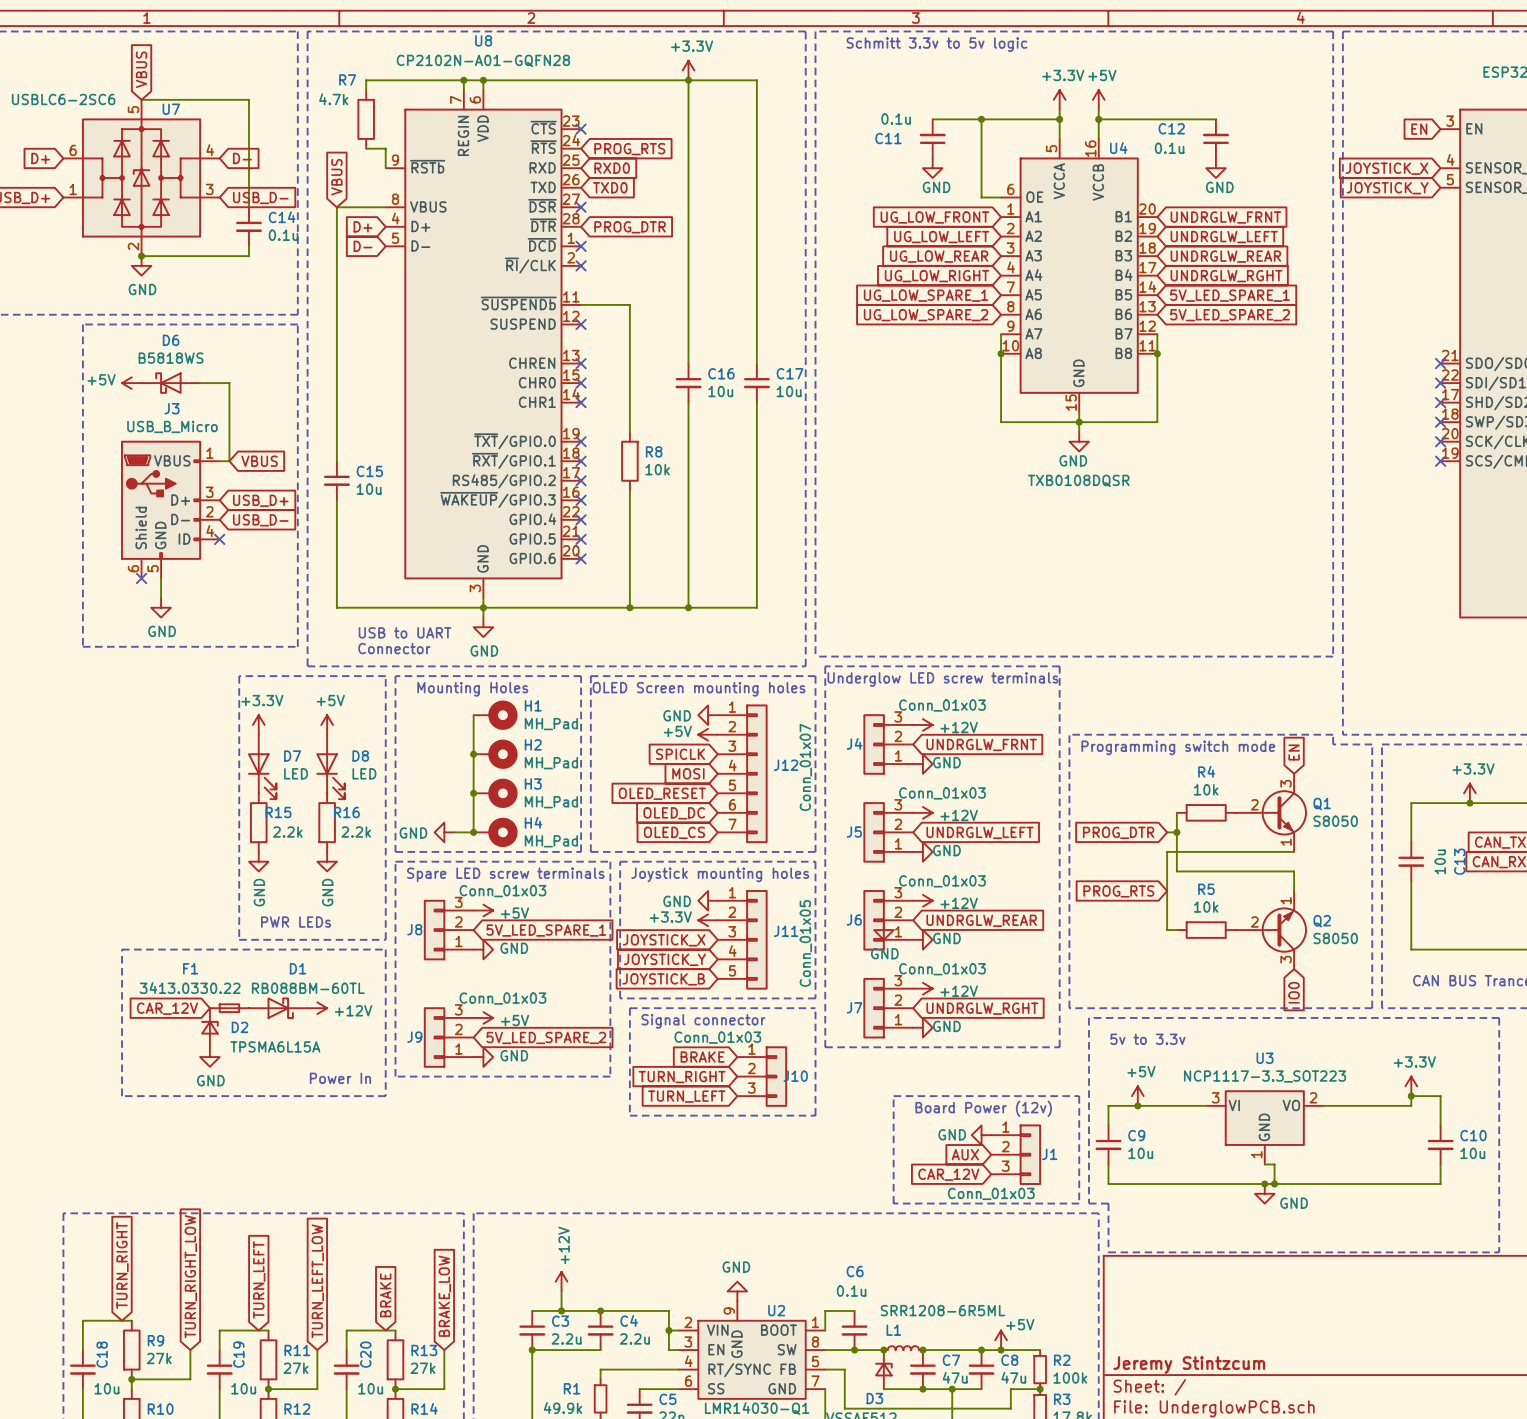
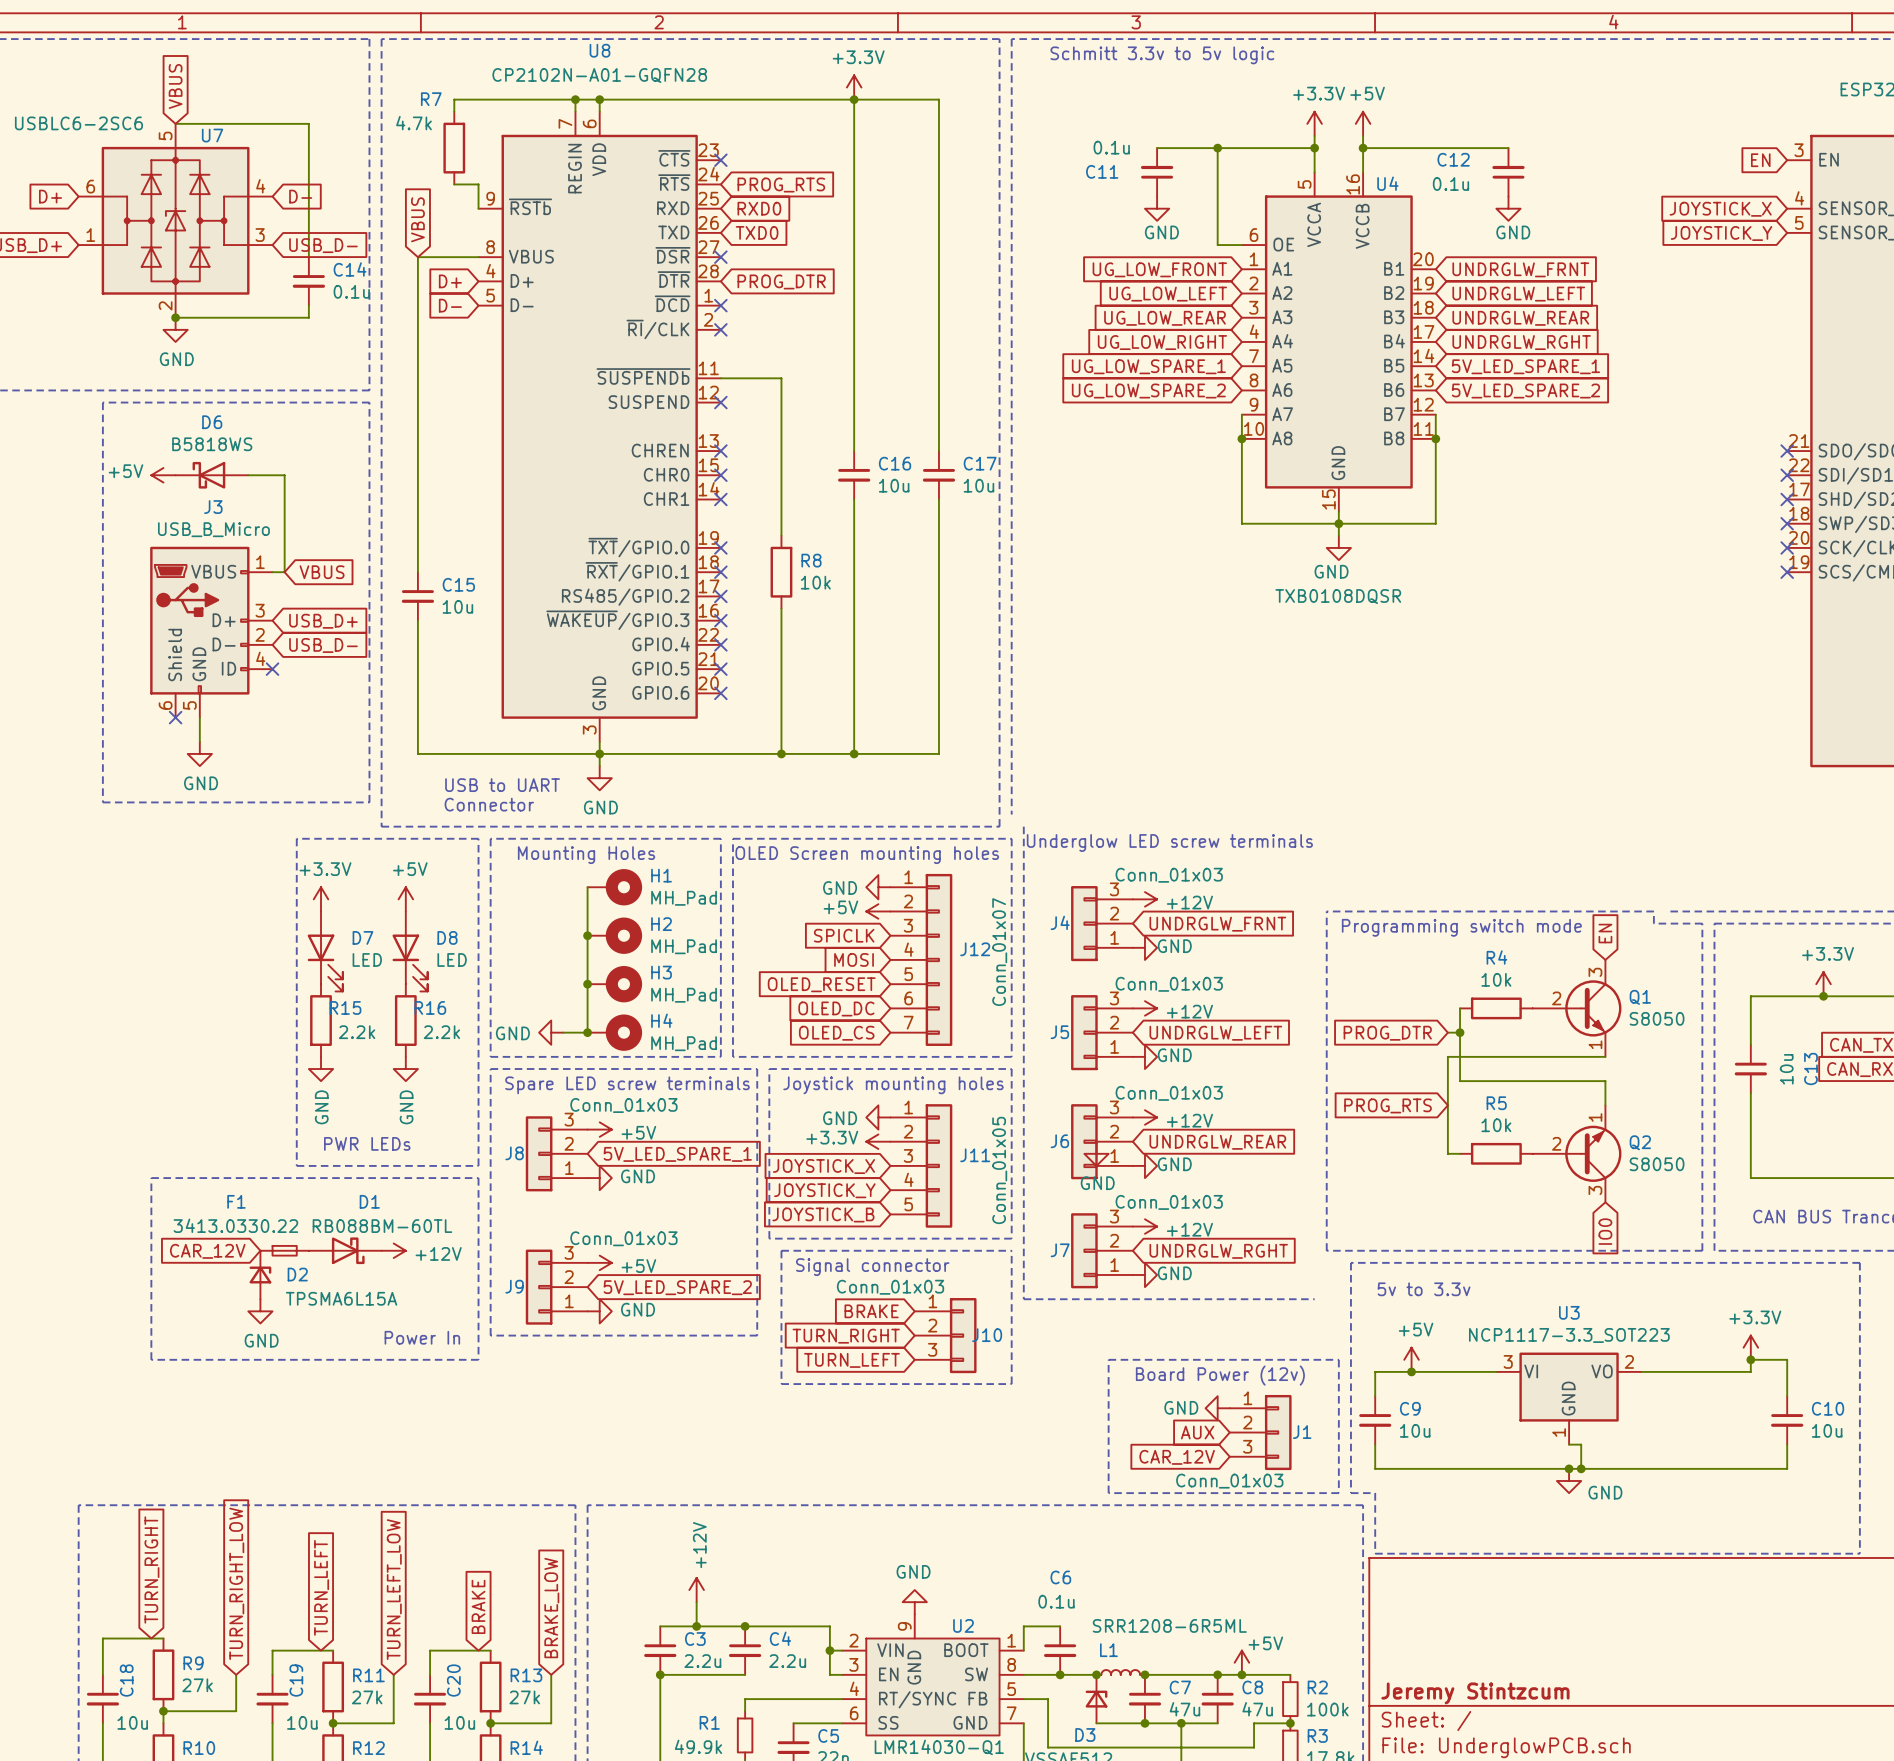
line: (1333, 31) (1333, 656) (815, 656) -> none
line: (1342, 31) (1342, 734) -> none
line: (825, 666) (1059, 666) (1059, 1047) -> none

